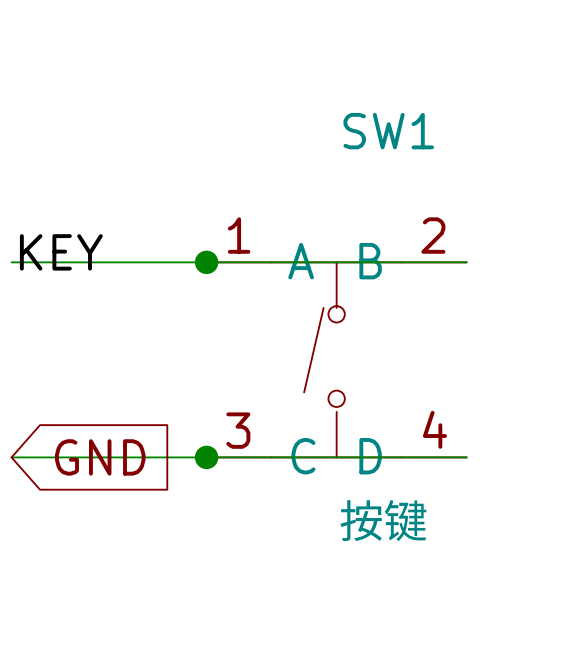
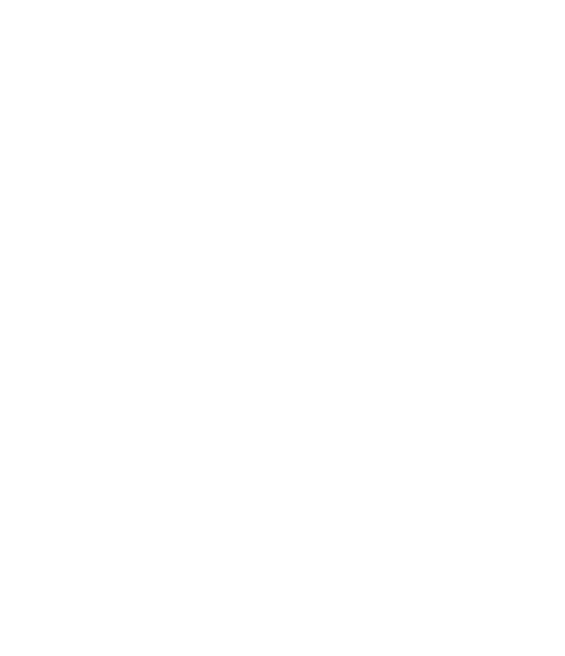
label: KEY (61, 252) -> none
wire: (11, 262) (466, 262) -> none
junction: (206, 262) -> none
SW1: 按键 (336, 359) -> none
wire: (11, 457) (466, 457) -> none
global label: GND (100, 457) -> none
junction: (206, 457) -> none

